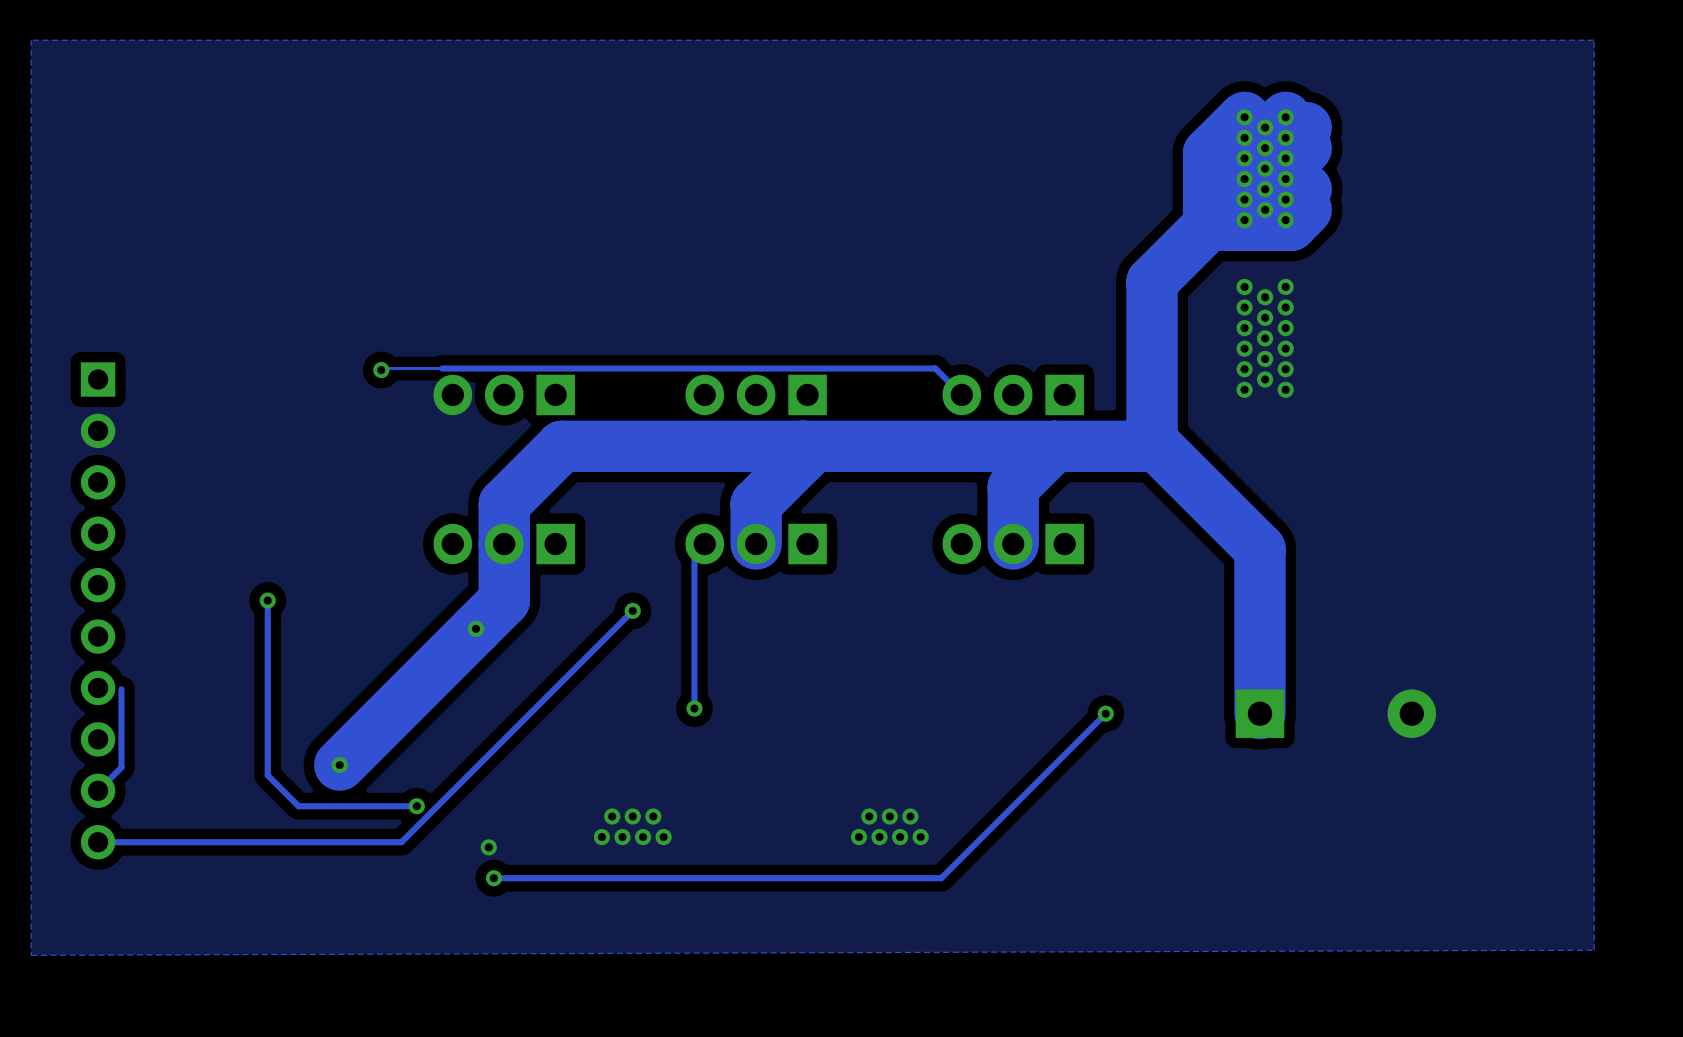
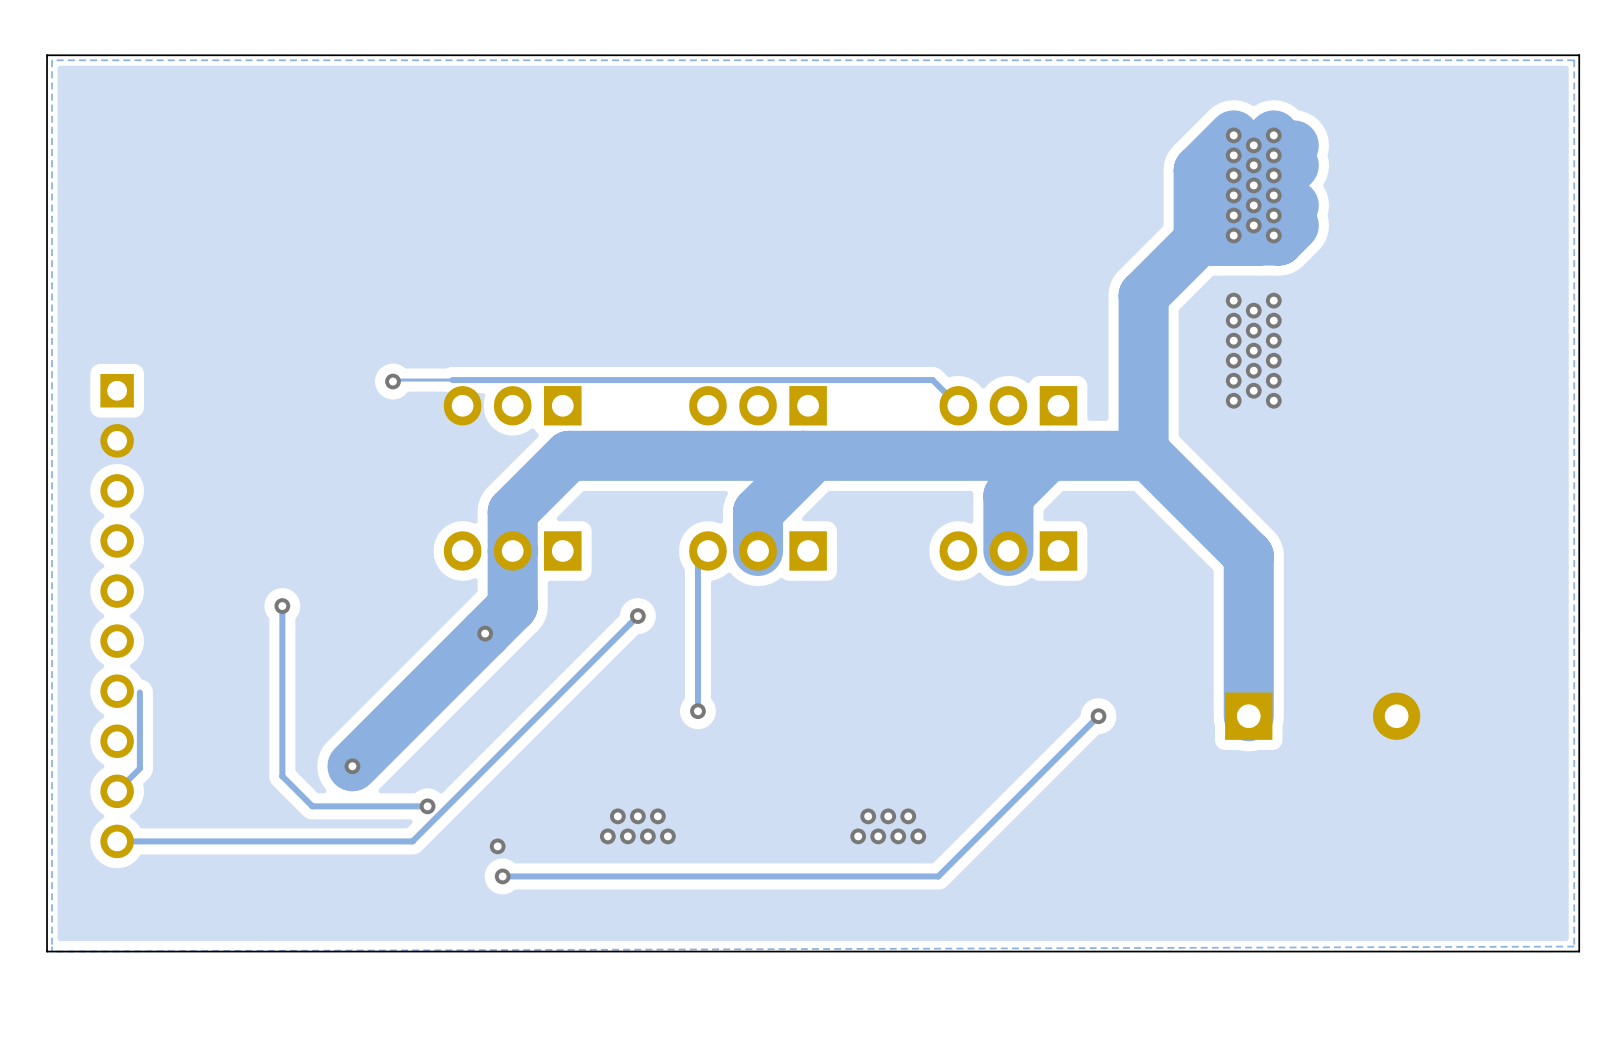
board edge: none -> (1579, 55) (47, 55) (47, 951) (1579, 951) (1579, 55)

